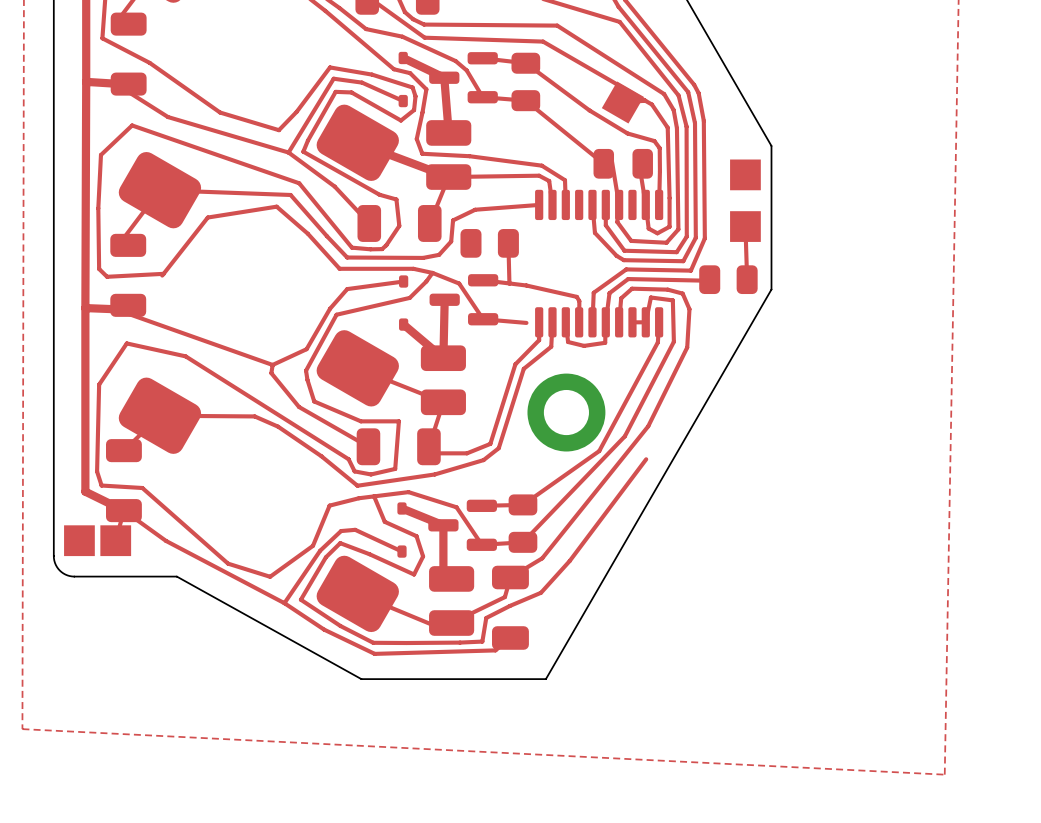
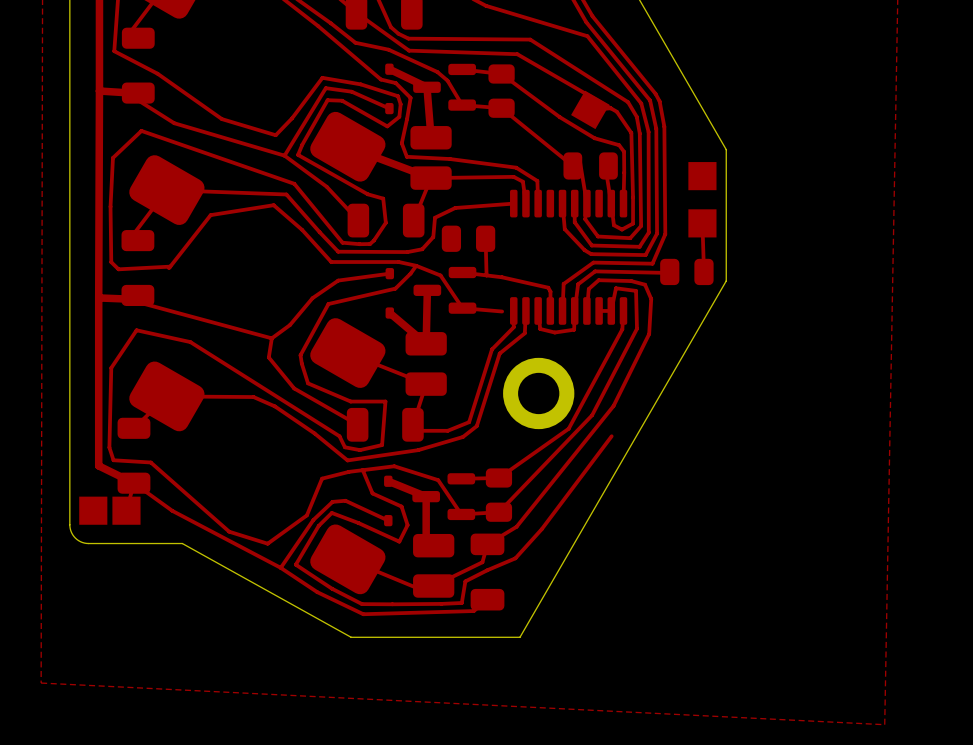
top track: (347, 289) (330, 308) (306, 349) (272, 364) (115, 309) -> (271, 338) (126, 299)
top track: none -> (338, 280) (312, 298) (290, 325) (271, 338)
top track: none -> (271, 338) (270, 349)

